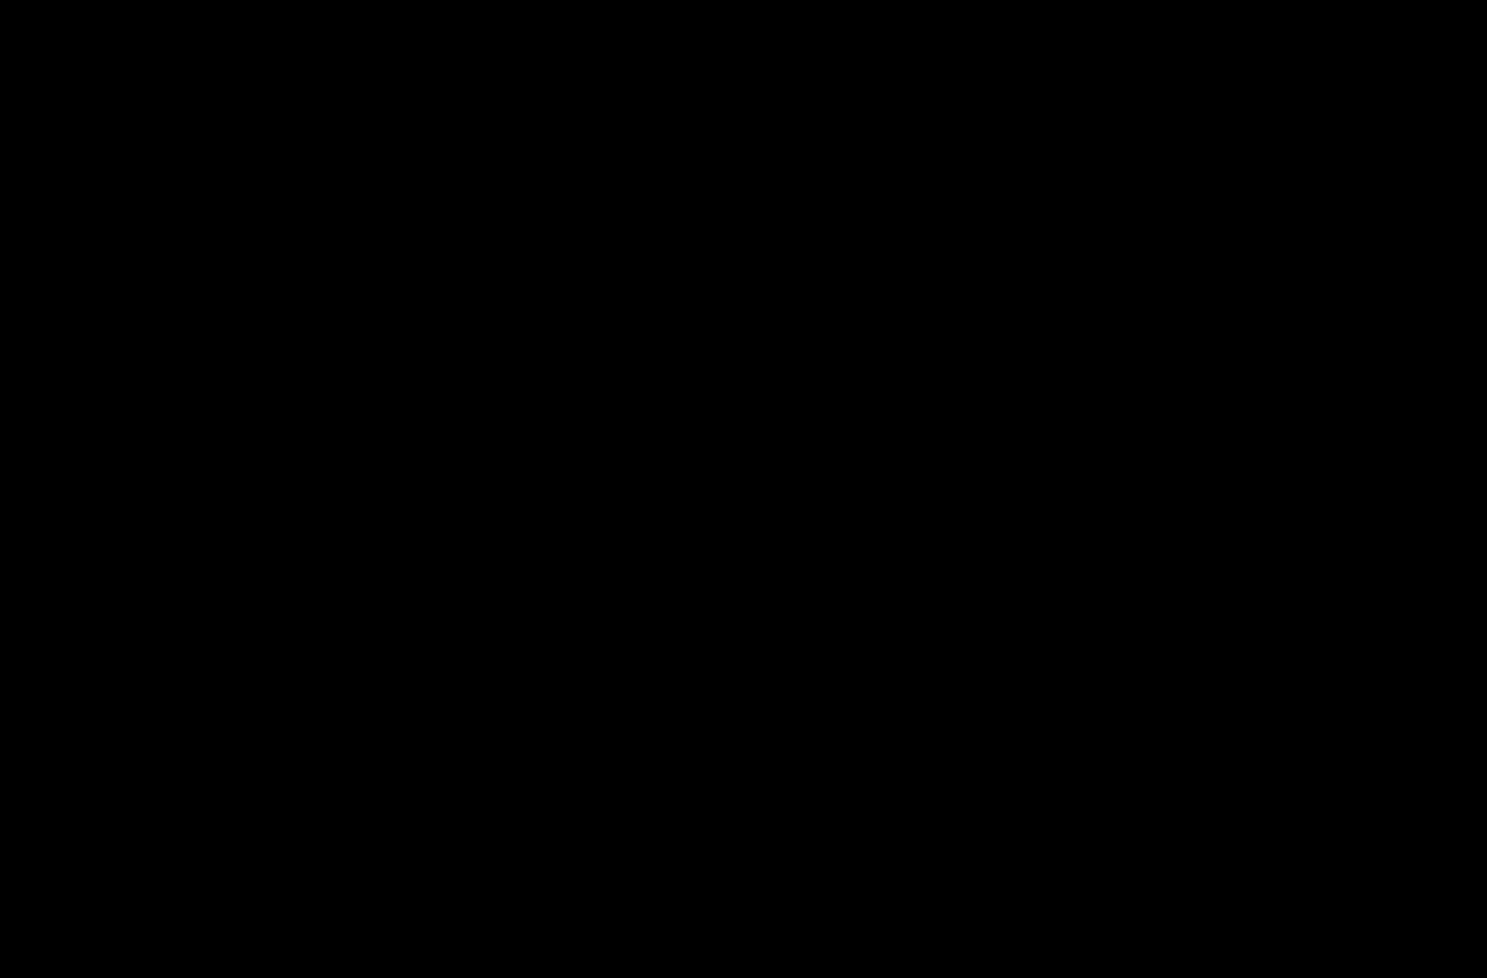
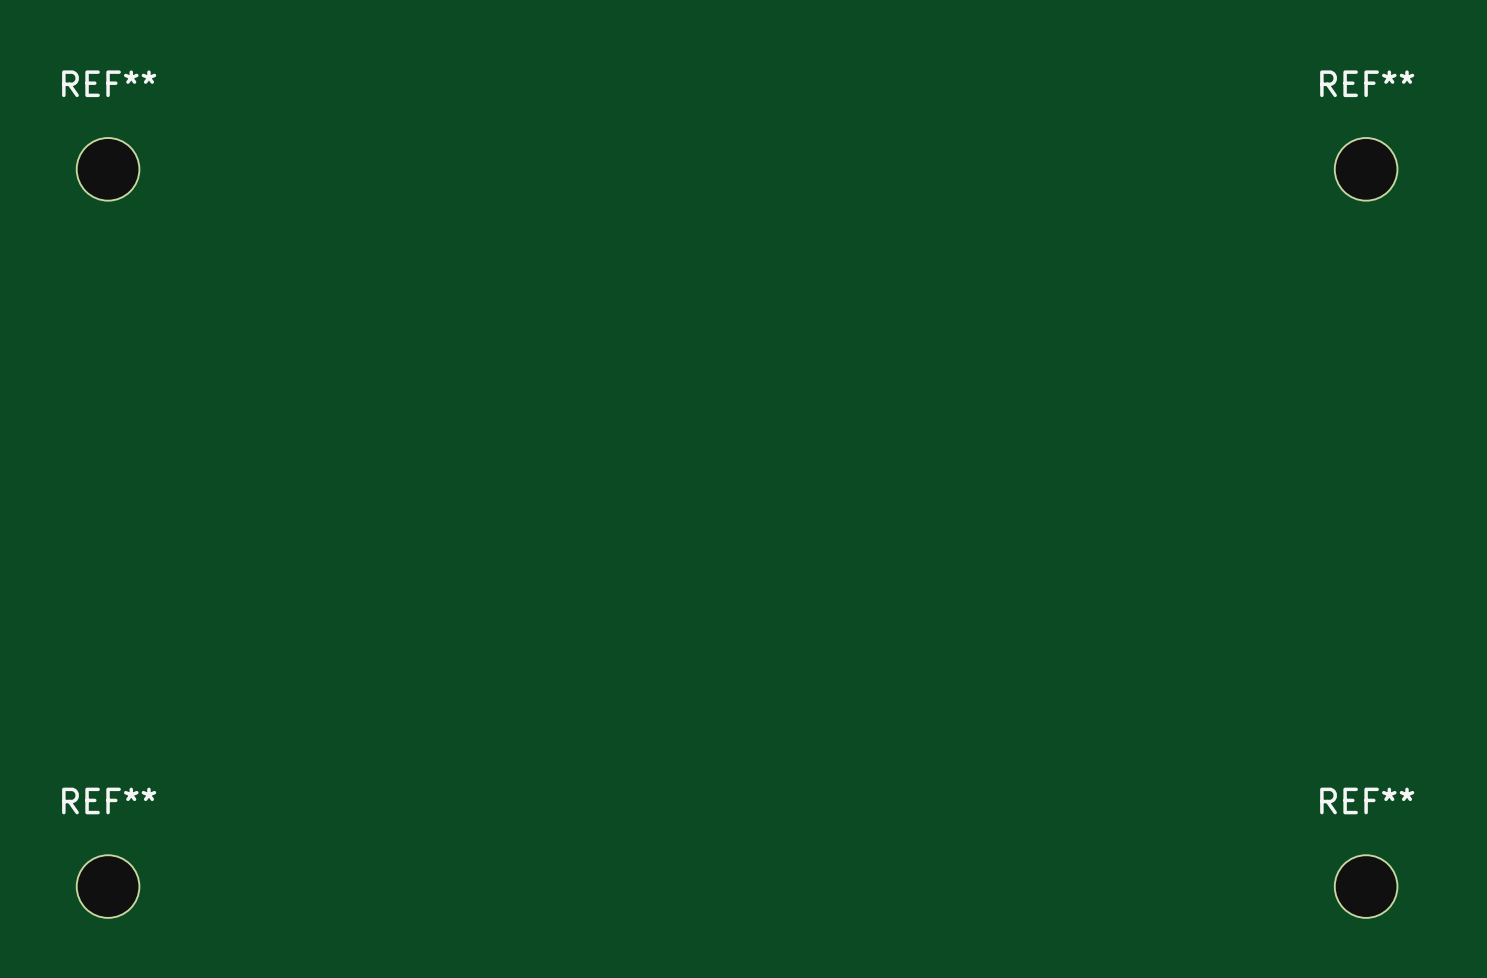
REF**: none -> (108, 169)
REF**: none -> (1366, 169)
REF**: none -> (108, 886)
REF**: none -> (1366, 886)

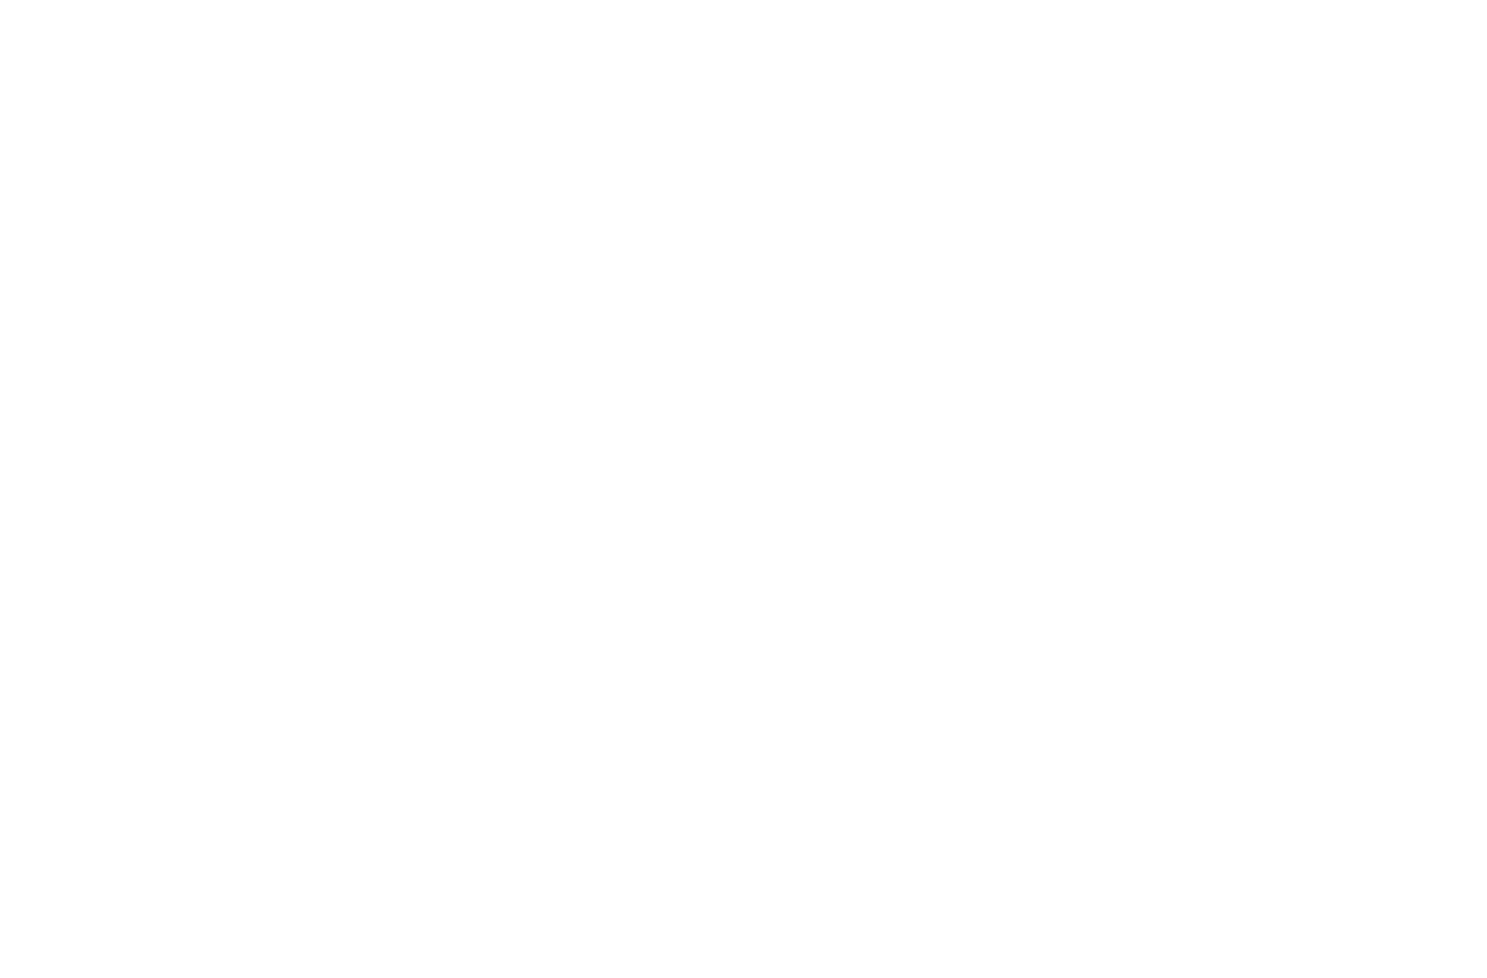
REF**: (108, 169) -> none
REF**: (1366, 169) -> none
REF**: (108, 886) -> none
REF**: (1366, 886) -> none

